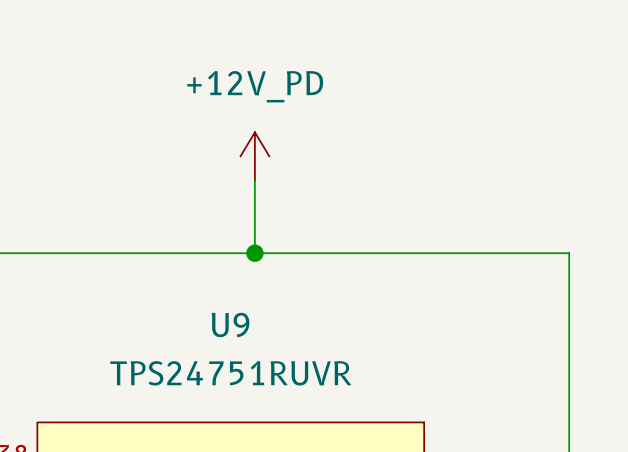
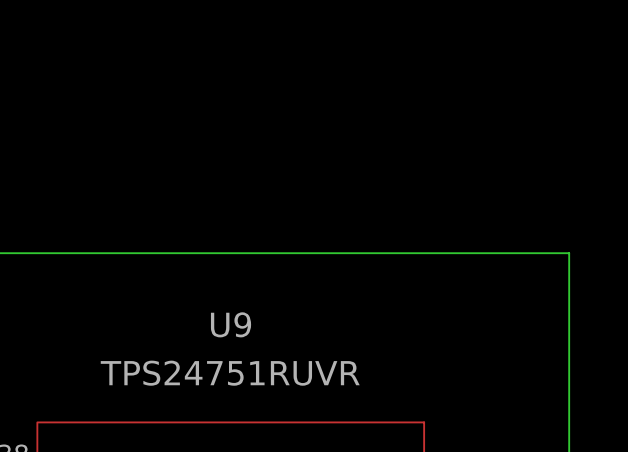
power symbol: +12V_PD (254, 156) -> none
wire: (254, 180) (254, 253) -> none
junction: (254, 253) -> none

